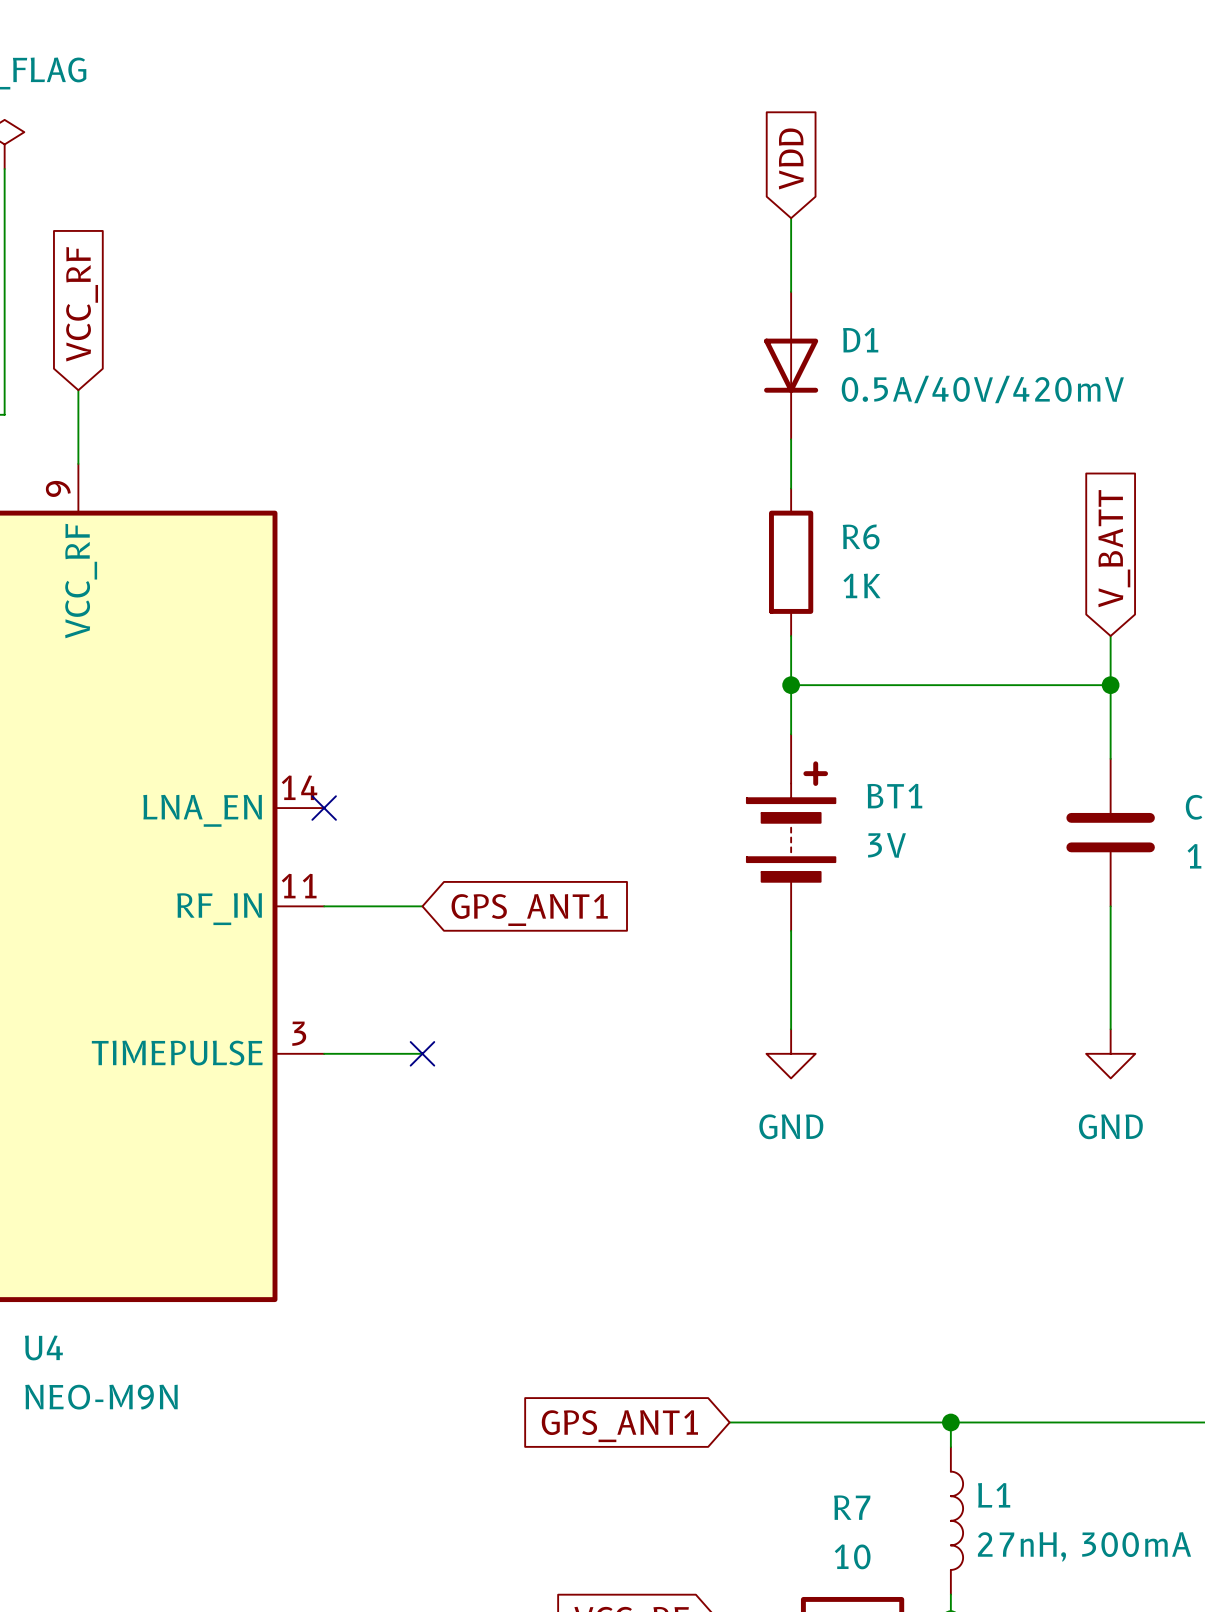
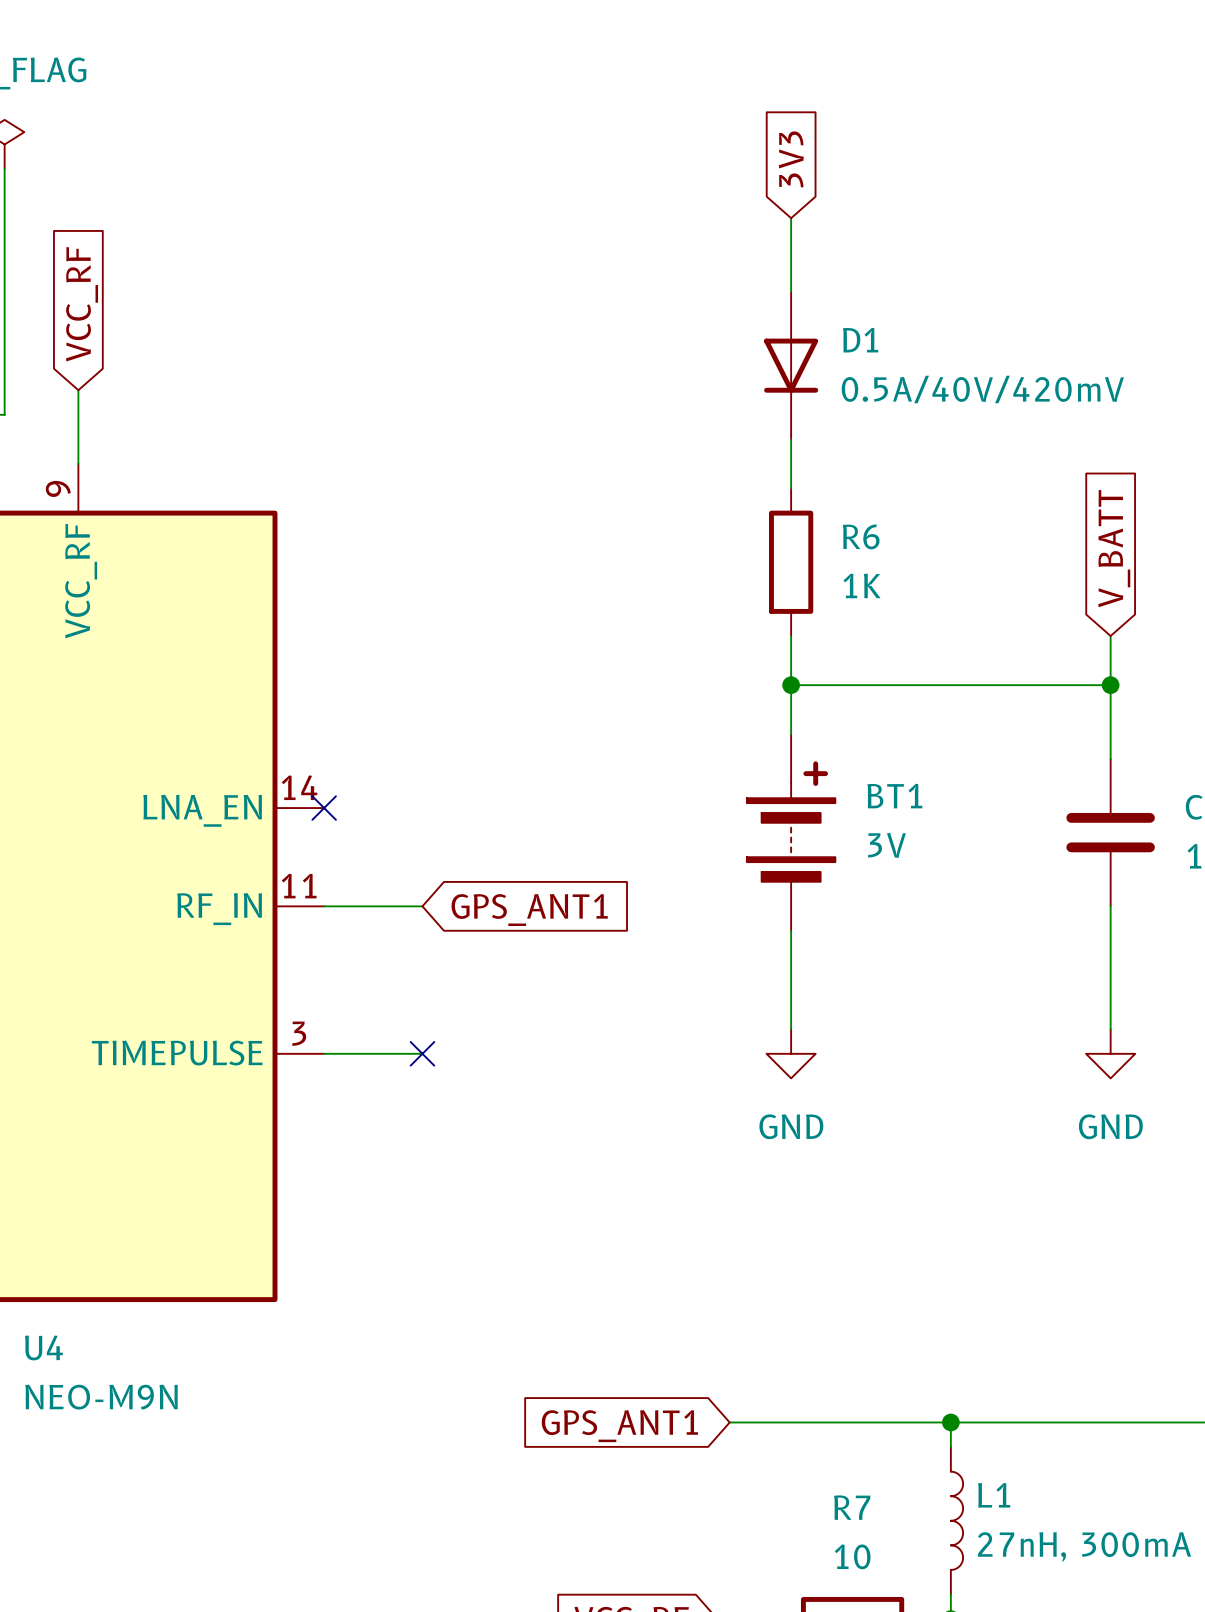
global label: VDD (791, 158) -> 3V3 (791, 159)

